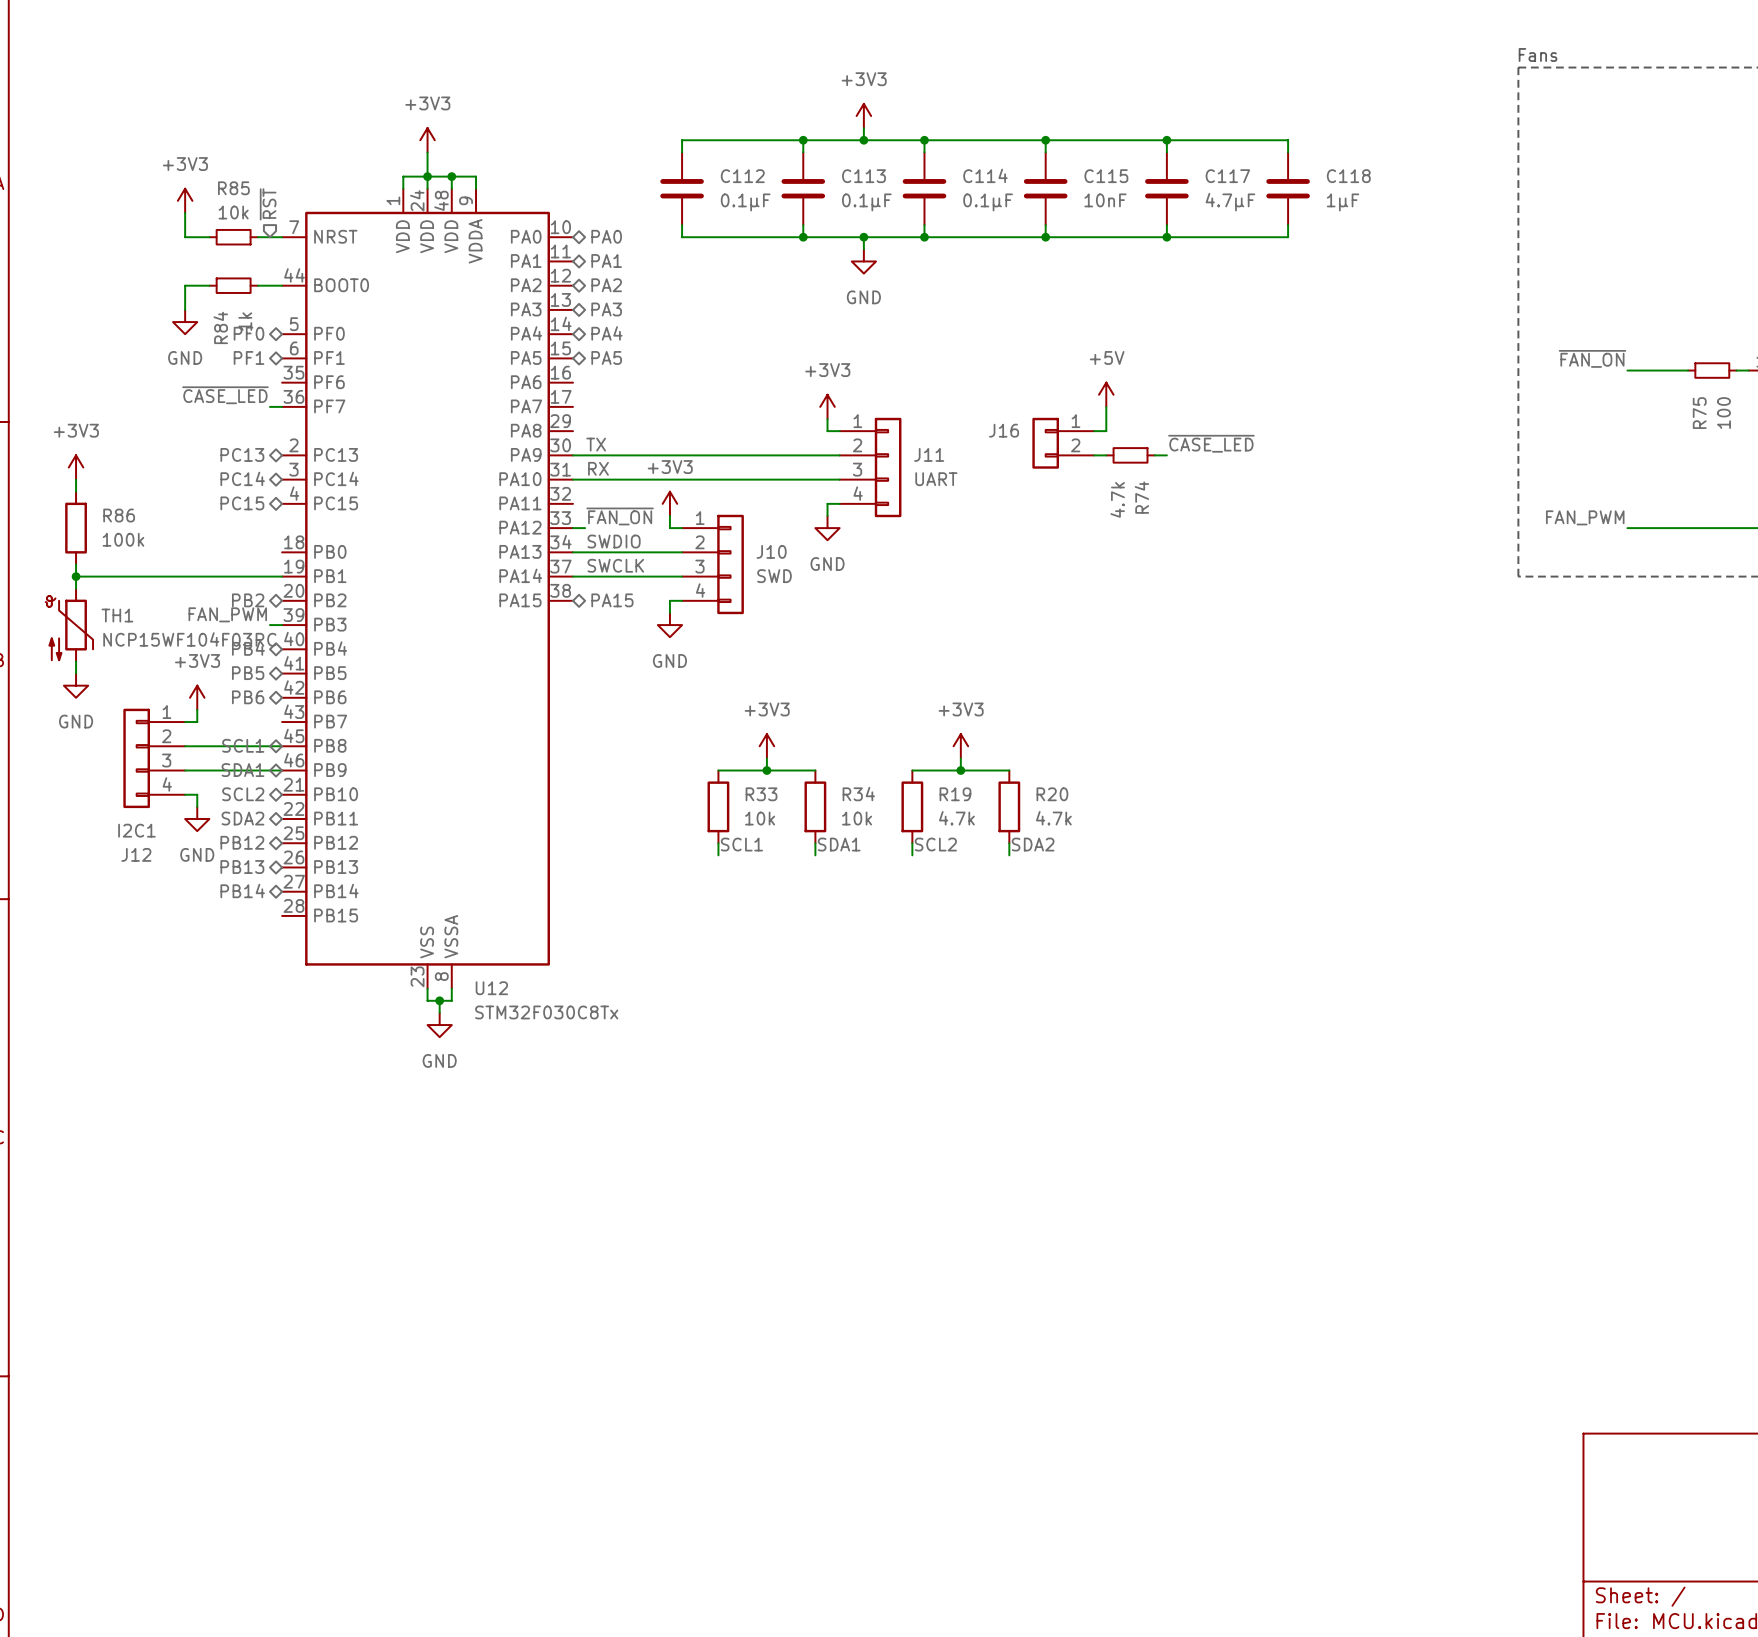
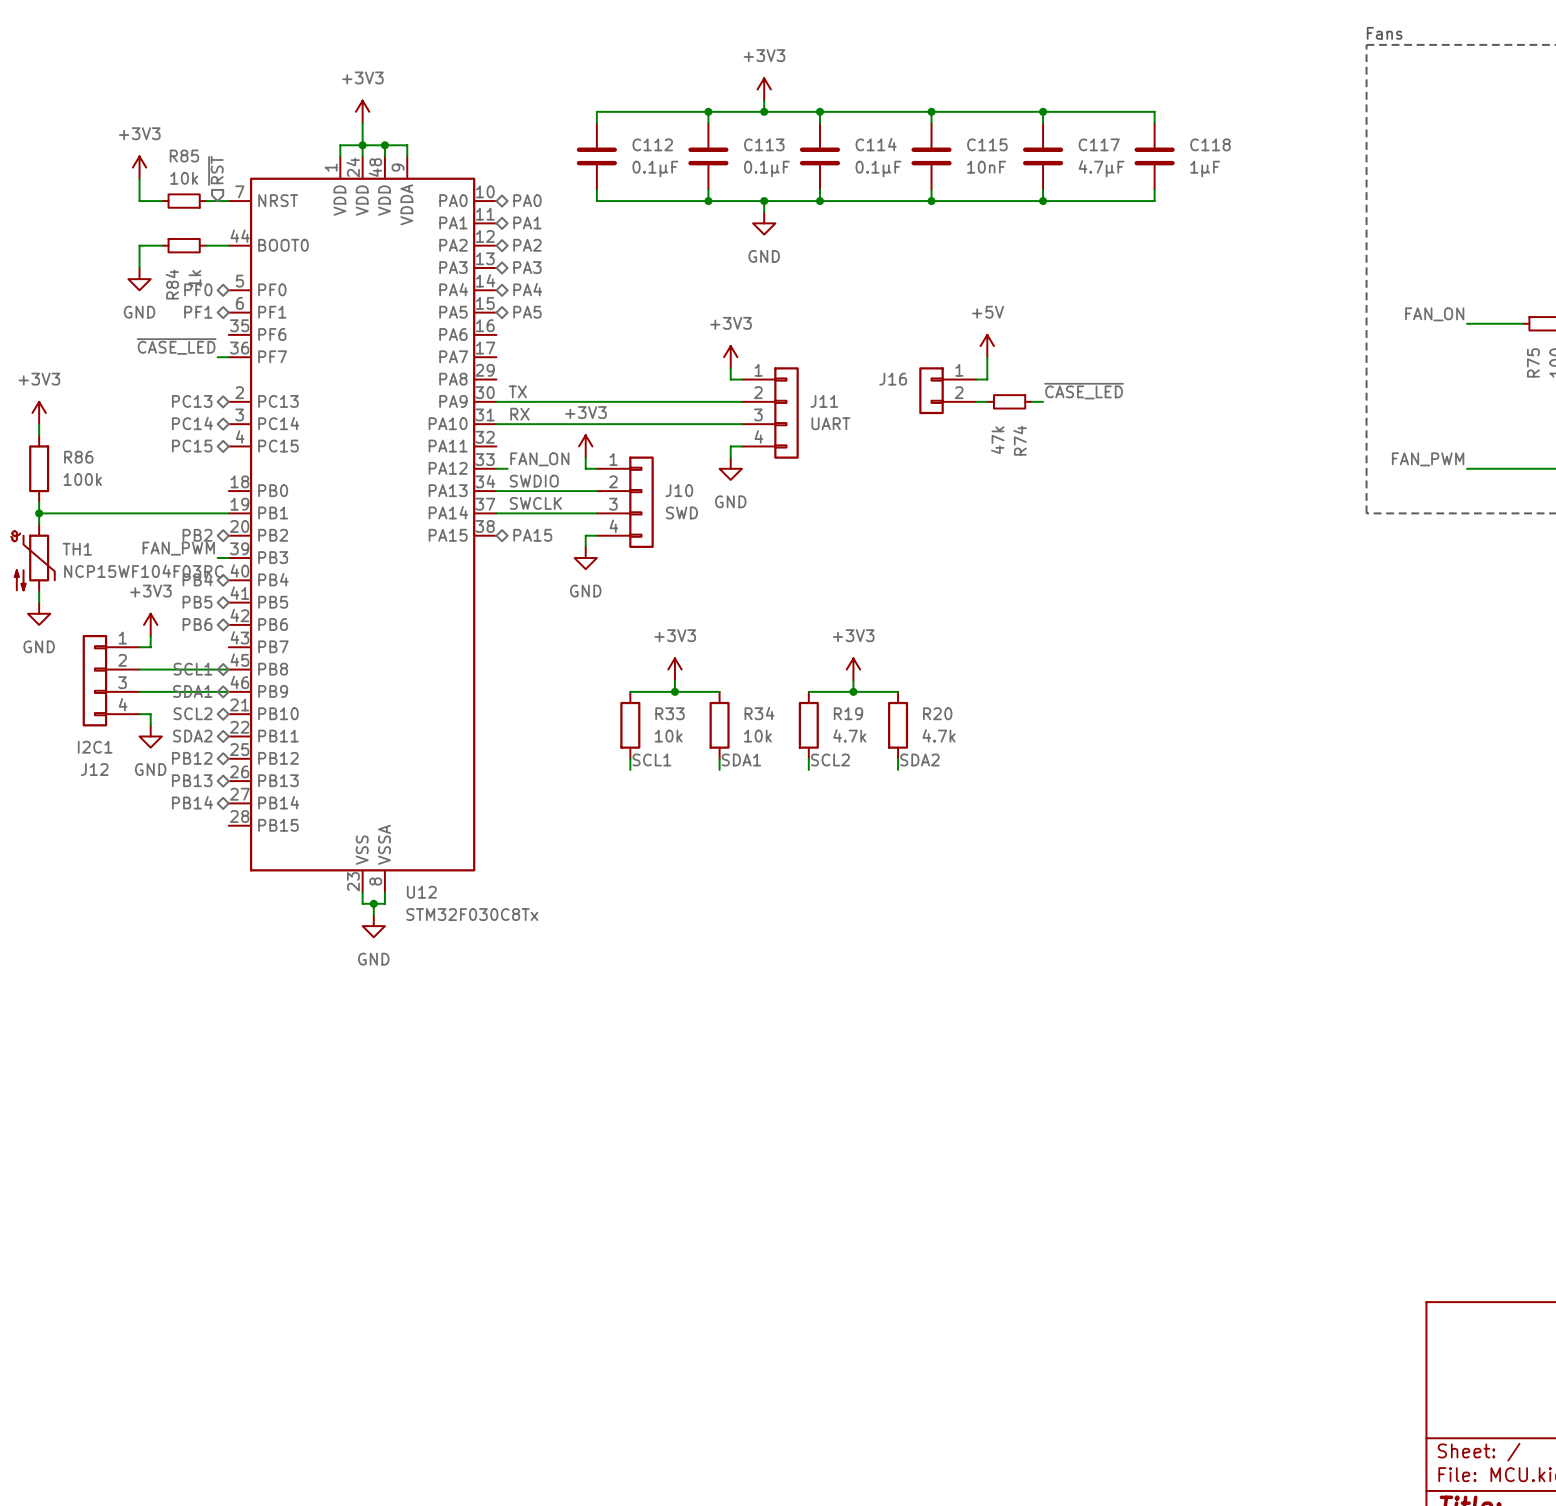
label: ~{FAN_ON} (1592, 358) -> FAN_ON (1434, 314)
R74 value: 4.7k (1117, 499) -> 47k (997, 440)
label: ~{FAN_ON} (620, 516) -> FAN_ON (539, 459)

